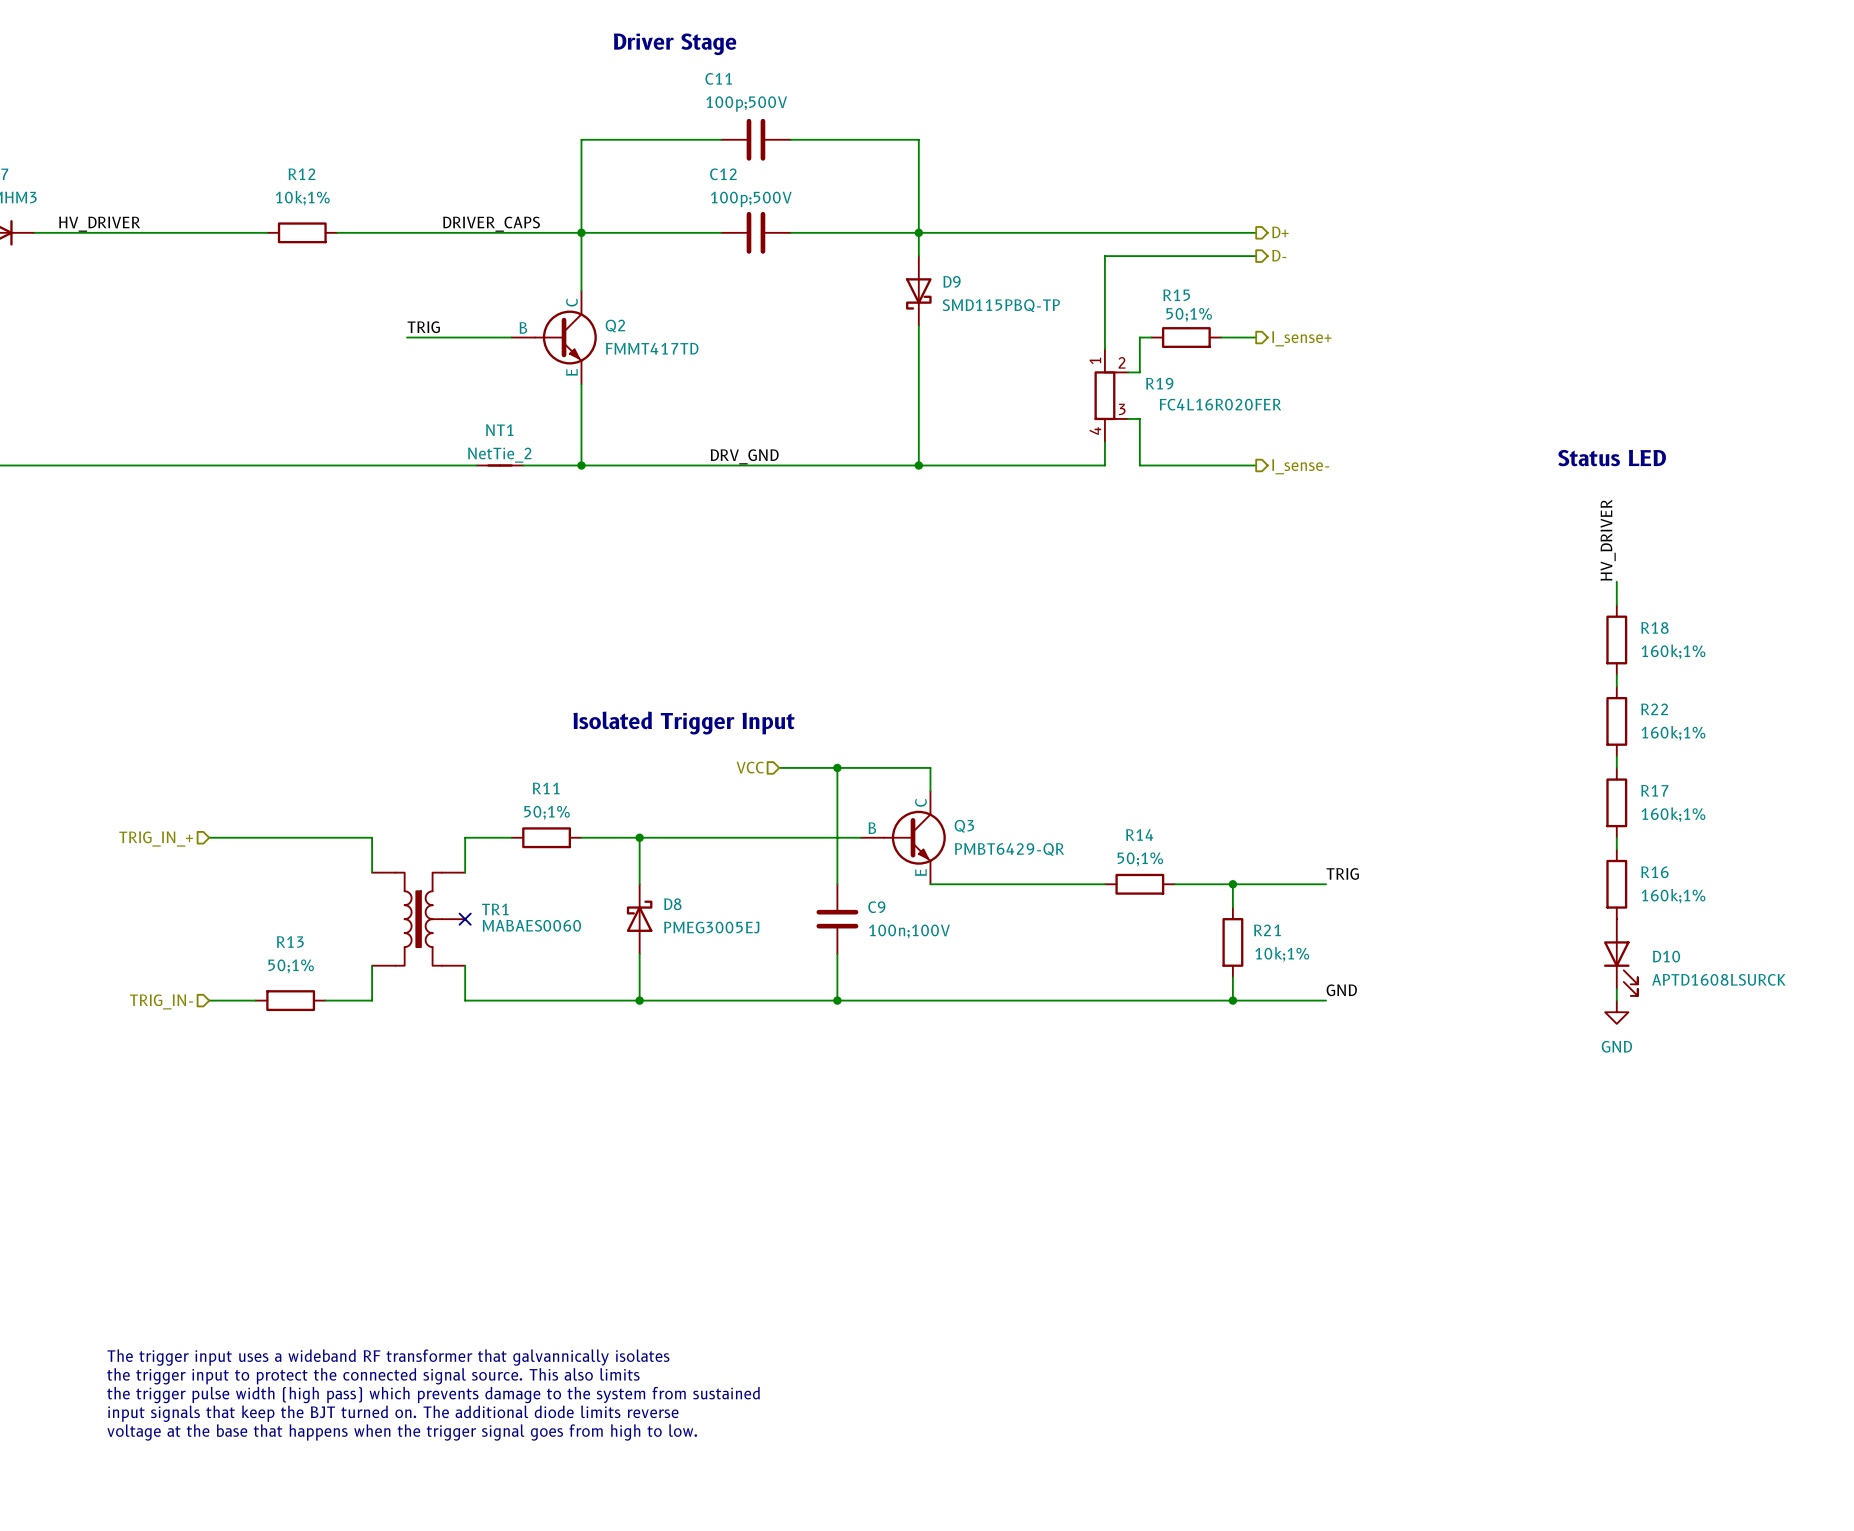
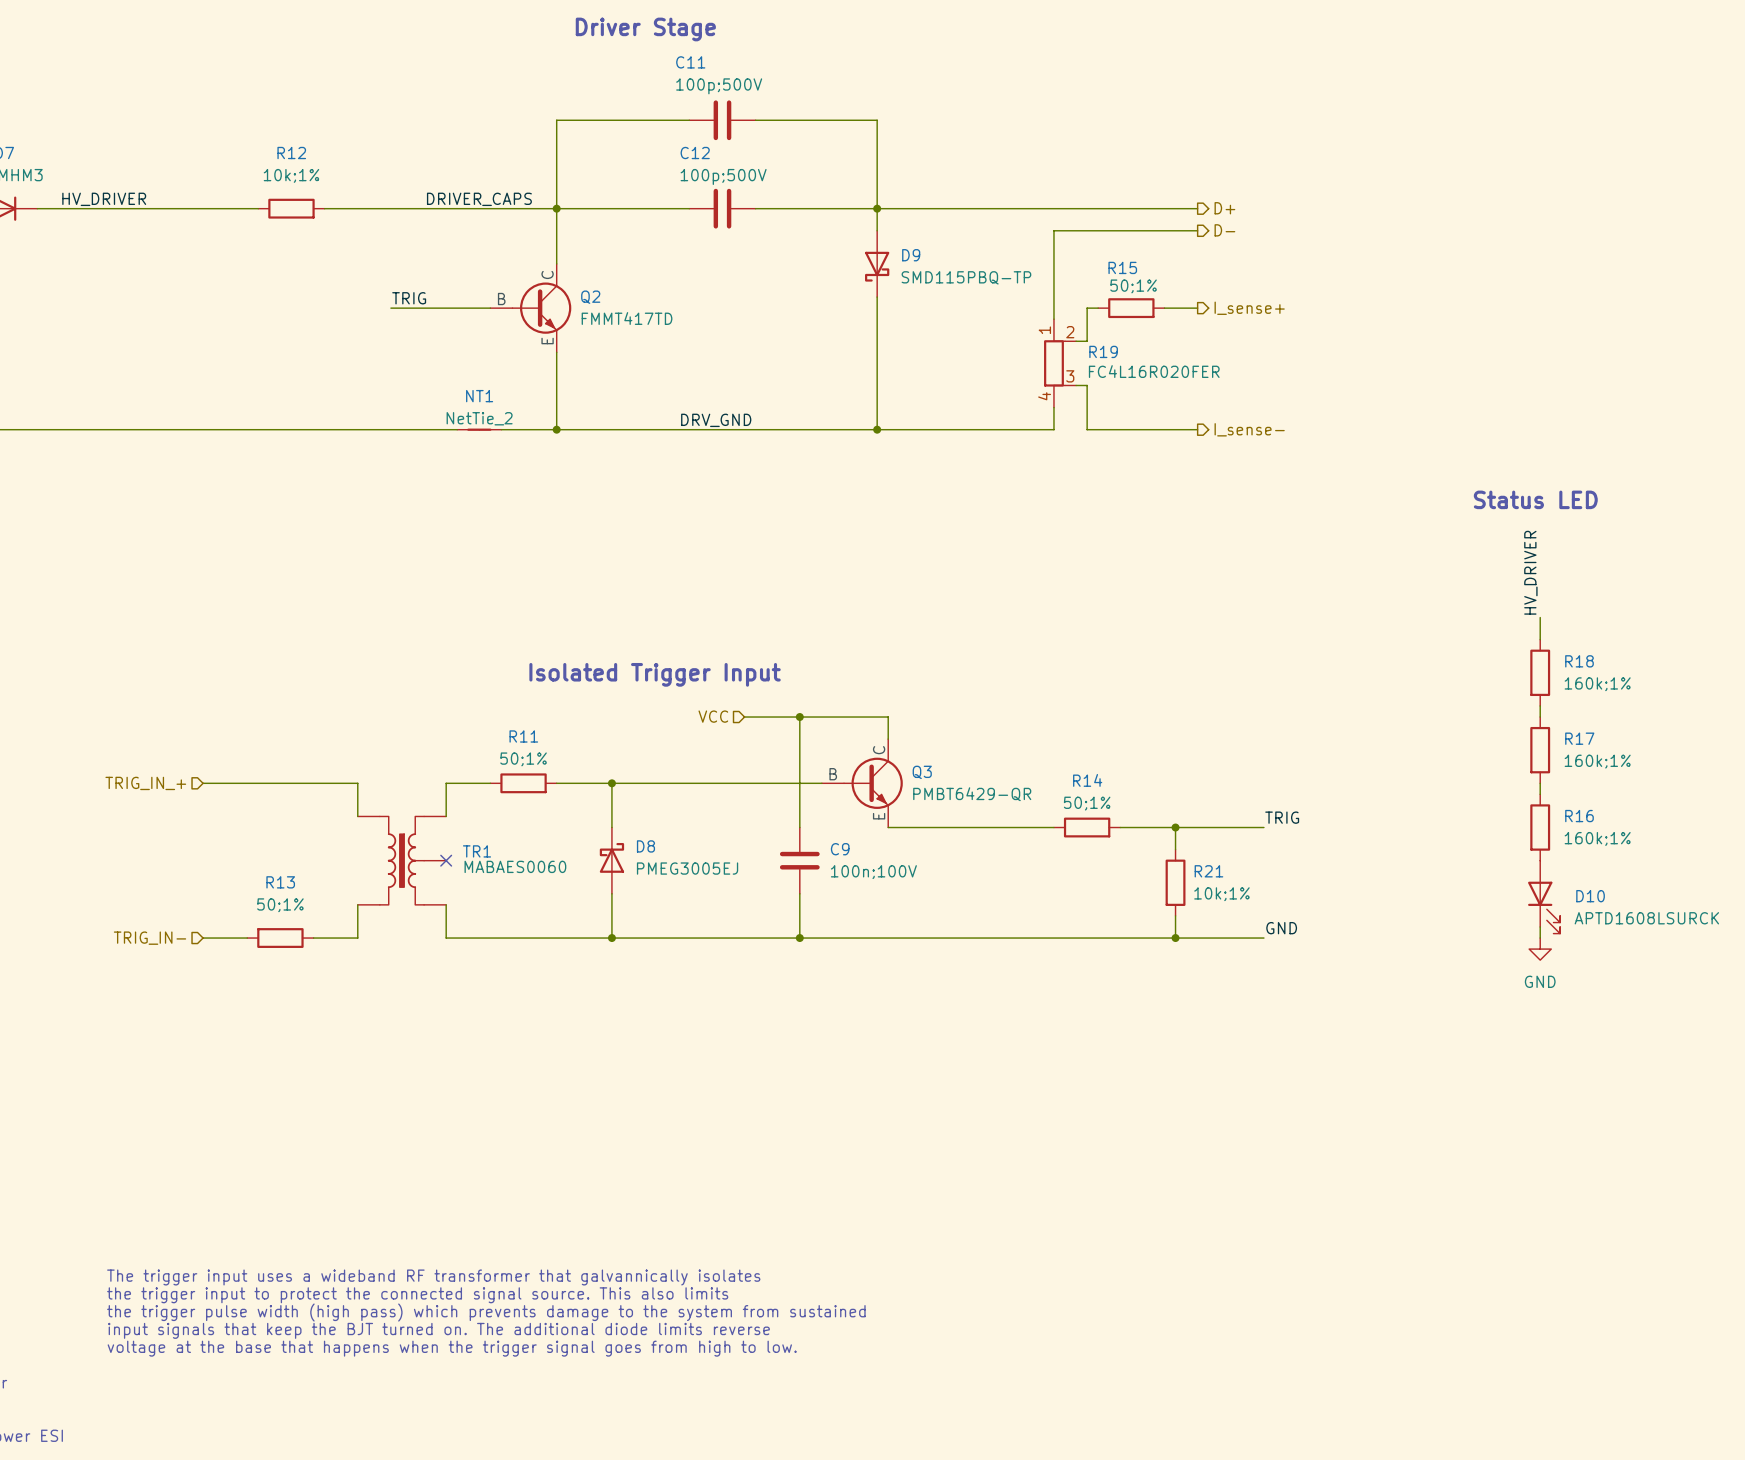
text position: Status LED (1612, 458) -> Status LED (1535, 499)
label position: HV_DRIVER (1608, 540) -> HV_DRIVER (1530, 572)
wire: (1616, 581) (1616, 605) -> none
R18: 160k;1% (1616, 639) -> none
R22 name: R22 (1654, 709) -> R18 (1579, 661)

